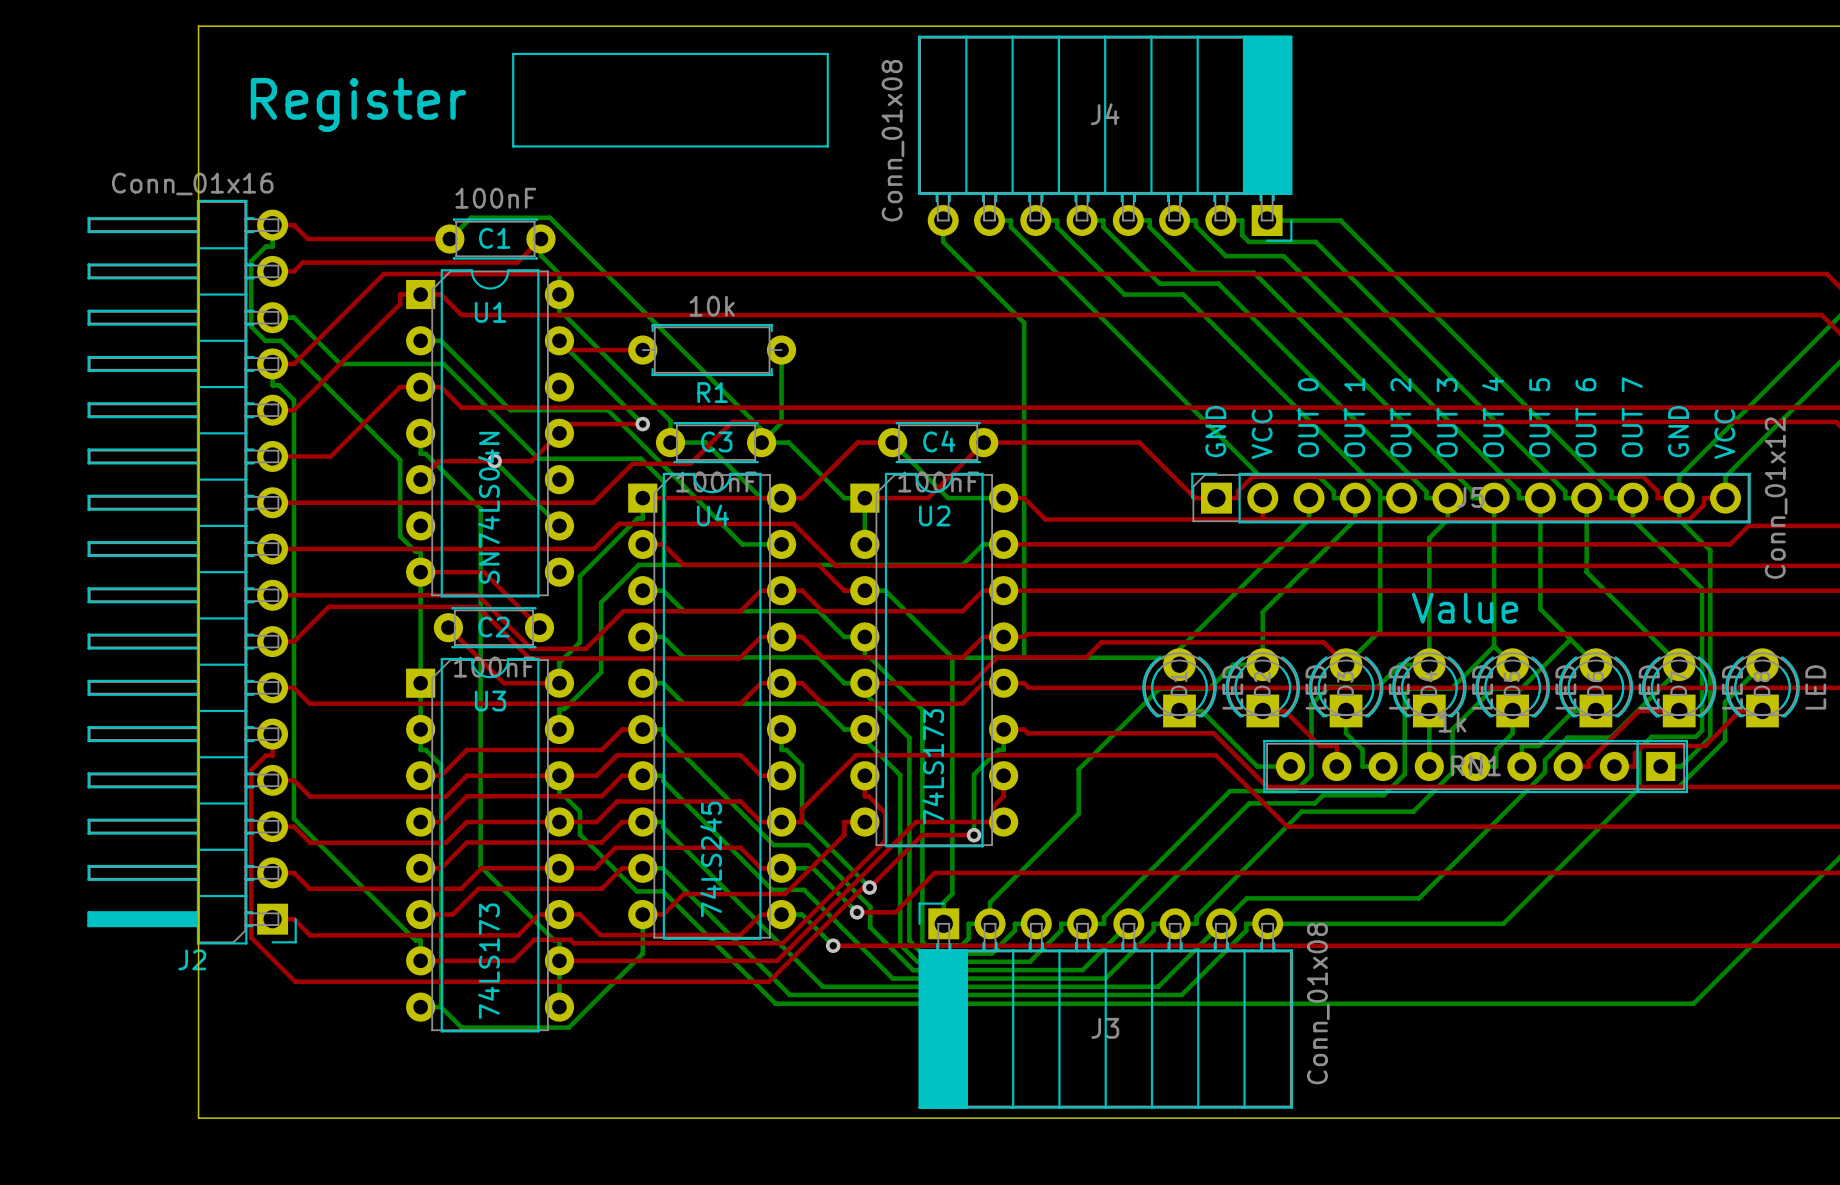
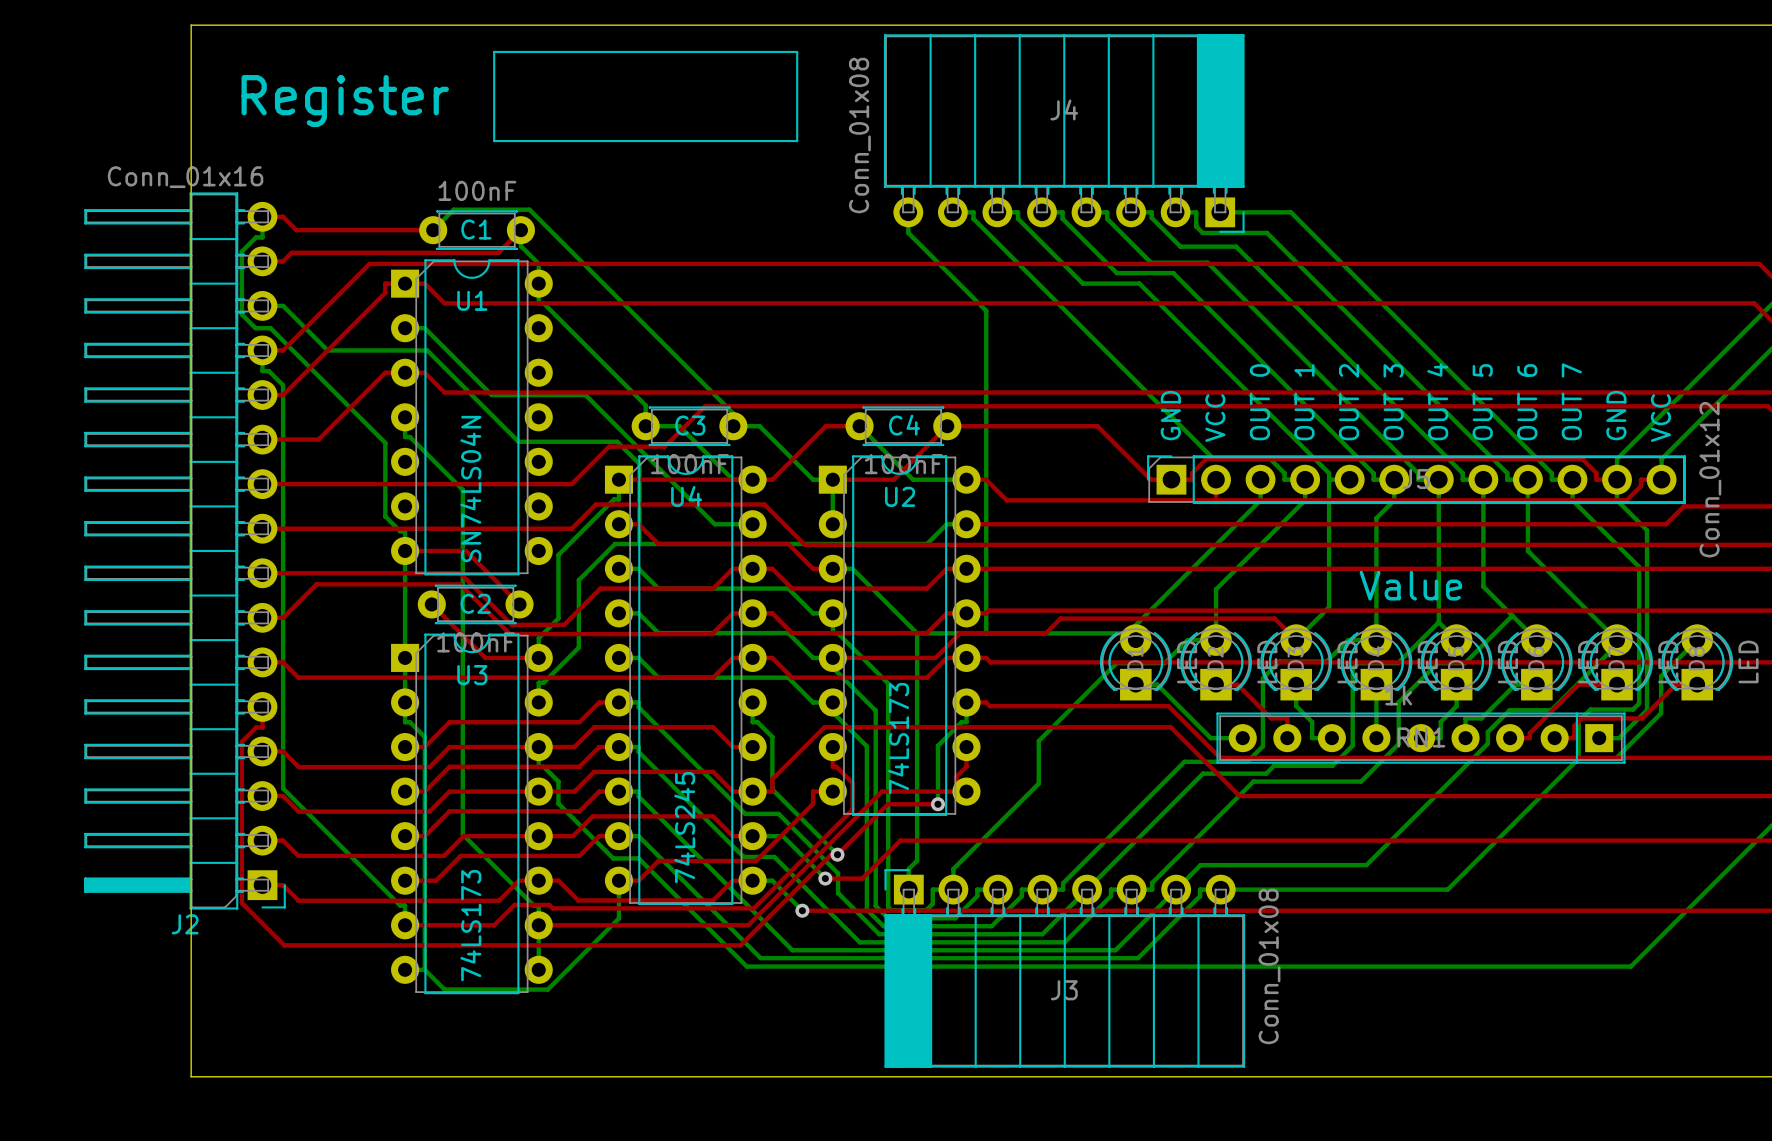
bottom track: (559, 340) (642, 424) -> none
top track: (559, 340) (568, 350) (642, 350) -> none
R1: 10k (712, 350) -> none
bottom track: (781, 350) (781, 422) (761, 442) -> none
top track: (642, 424) (568, 424) (531, 461) (439, 461) (420, 479) -> none
via: (642, 424) -> none
bottom track: (494, 461) (559, 525) -> none
via: (494, 461) -> none

